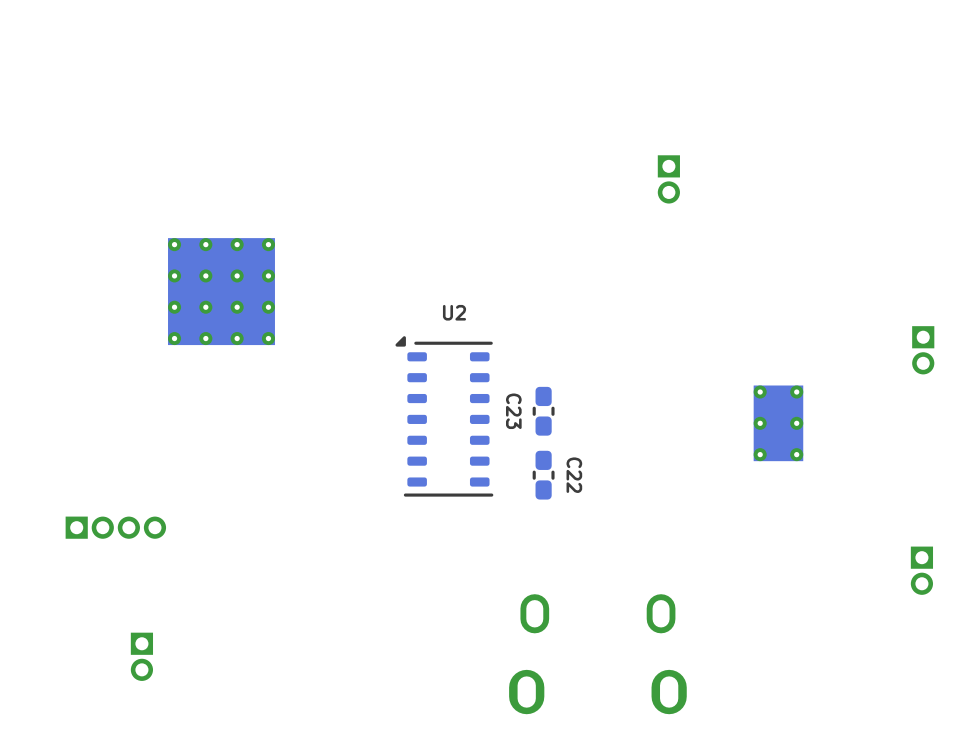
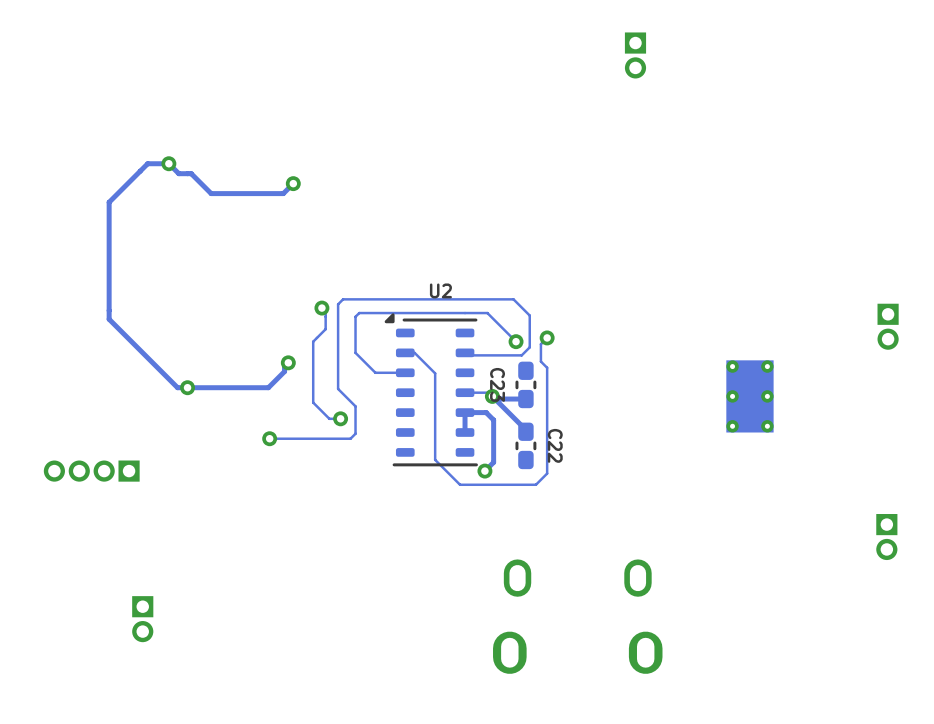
via: none -> (168, 163)
part position: (668, 179) -> (635, 55)
track: none -> (293, 183) (283, 193) (211, 193) (191, 173) (178, 173) (168, 163) (147, 163) (109, 202) (109, 319) (177, 387) (268, 387) (284, 371) (284, 366) (288, 362)
via: none -> (293, 183)
part: (221, 291) -> none
track: none -> (321, 308) (325, 311) (325, 329) (313, 341) (313, 402) (329, 418) (340, 418)
via: none -> (321, 308)
track: none -> (547, 337) (540, 344) (540, 361) (547, 367) (547, 473) (535, 484) (460, 484) (435, 459) (435, 373) (414, 352) (405, 352)
via: none -> (547, 337)
track: none -> (516, 341) (487, 313) (359, 313) (355, 316) (355, 352) (375, 372) (405, 372)
via: none -> (516, 341)
track: none -> (465, 352) (467, 355) (521, 355) (529, 347) (529, 315) (513, 299) (343, 299) (338, 304) (338, 388) (355, 406) (355, 433) (350, 438) (269, 438)
via: none -> (288, 362)
via: none -> (187, 387)
track: none -> (465, 392) (488, 392) (525, 431)
via: none -> (492, 396)
track: none -> (525, 399) (495, 399)
via: none -> (340, 418)
track: none -> (465, 432) (465, 412) (486, 412) (493, 420) (493, 462) (484, 471)
via: none -> (269, 438)
via: none -> (484, 471)
part rotation: 0° (115, 527) -> 180° (91, 471)

